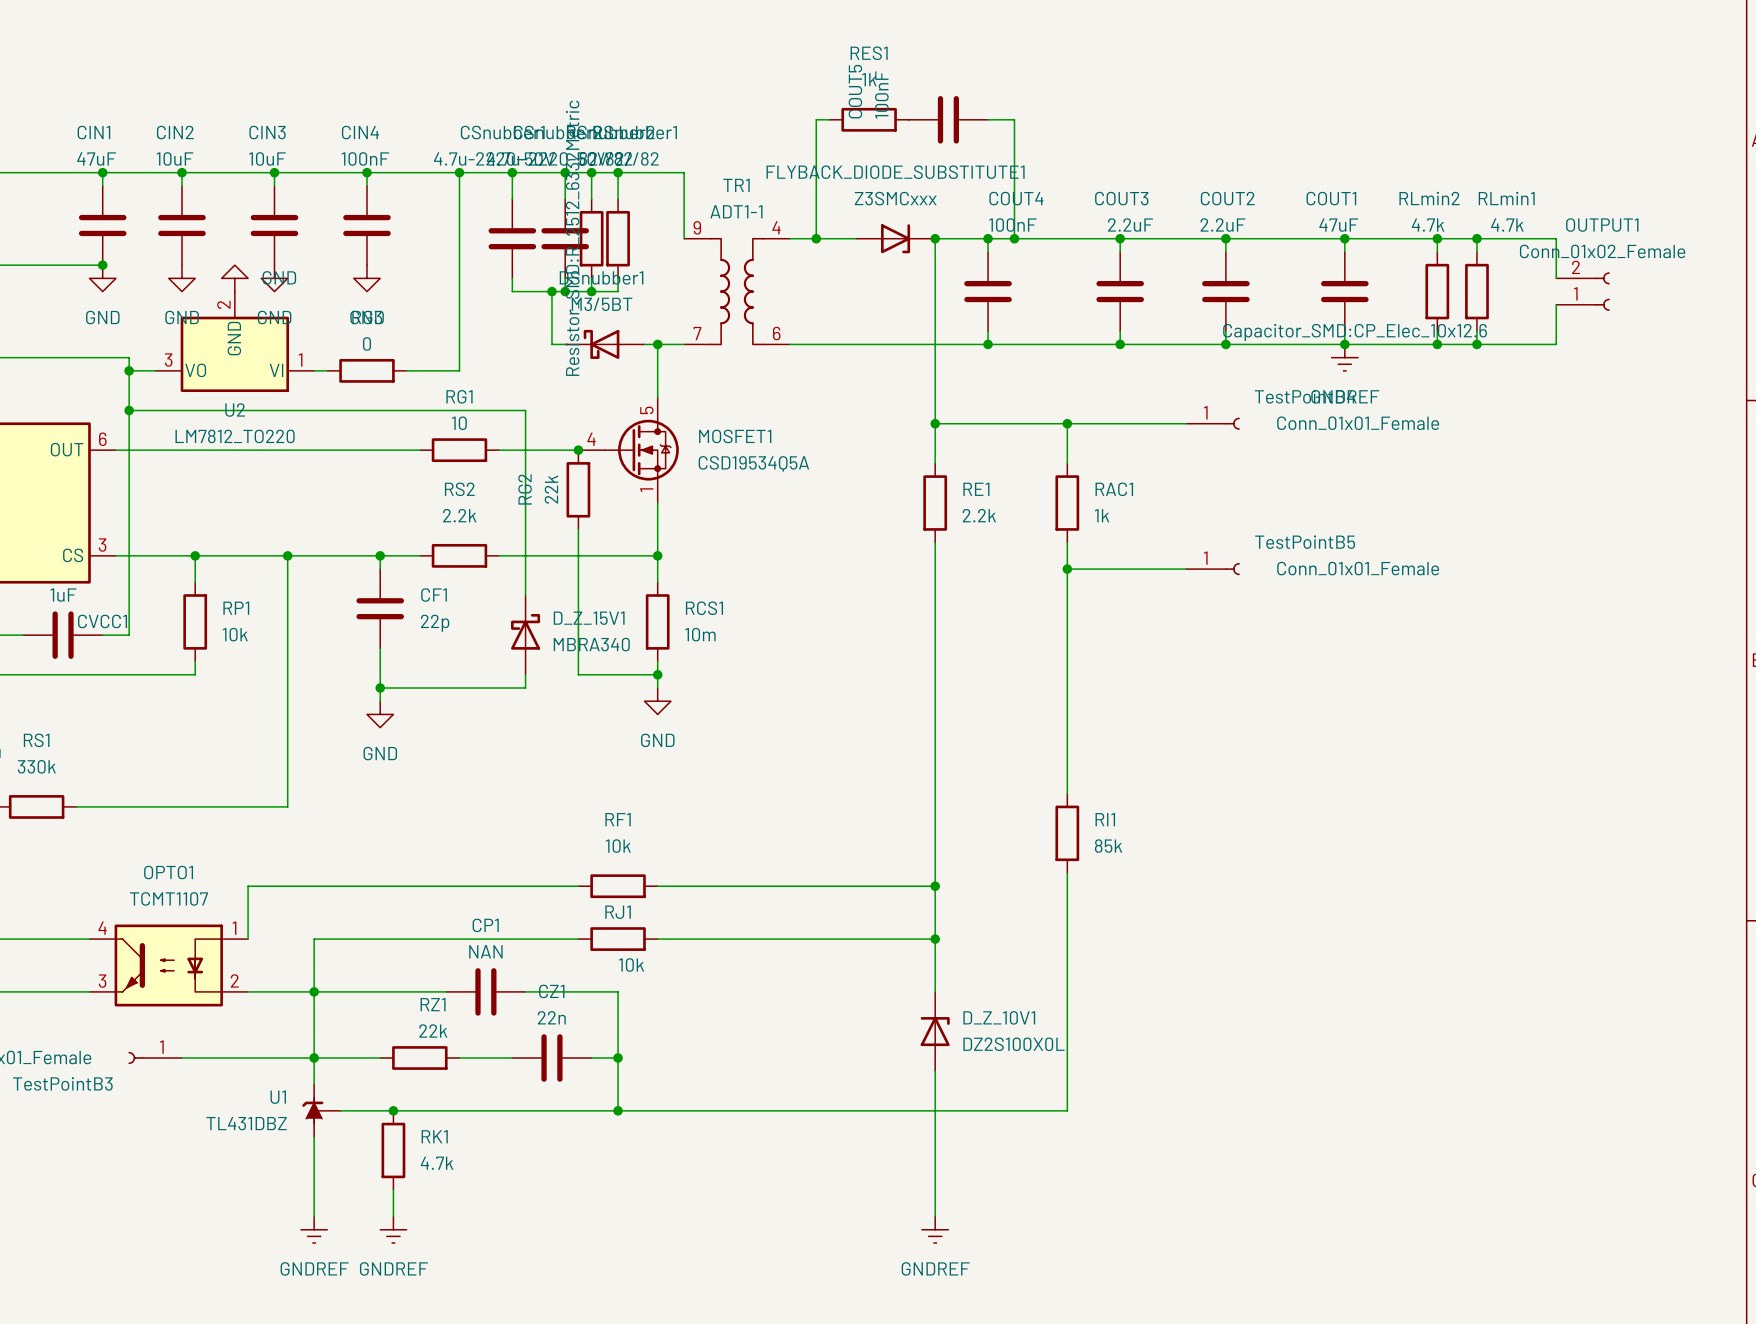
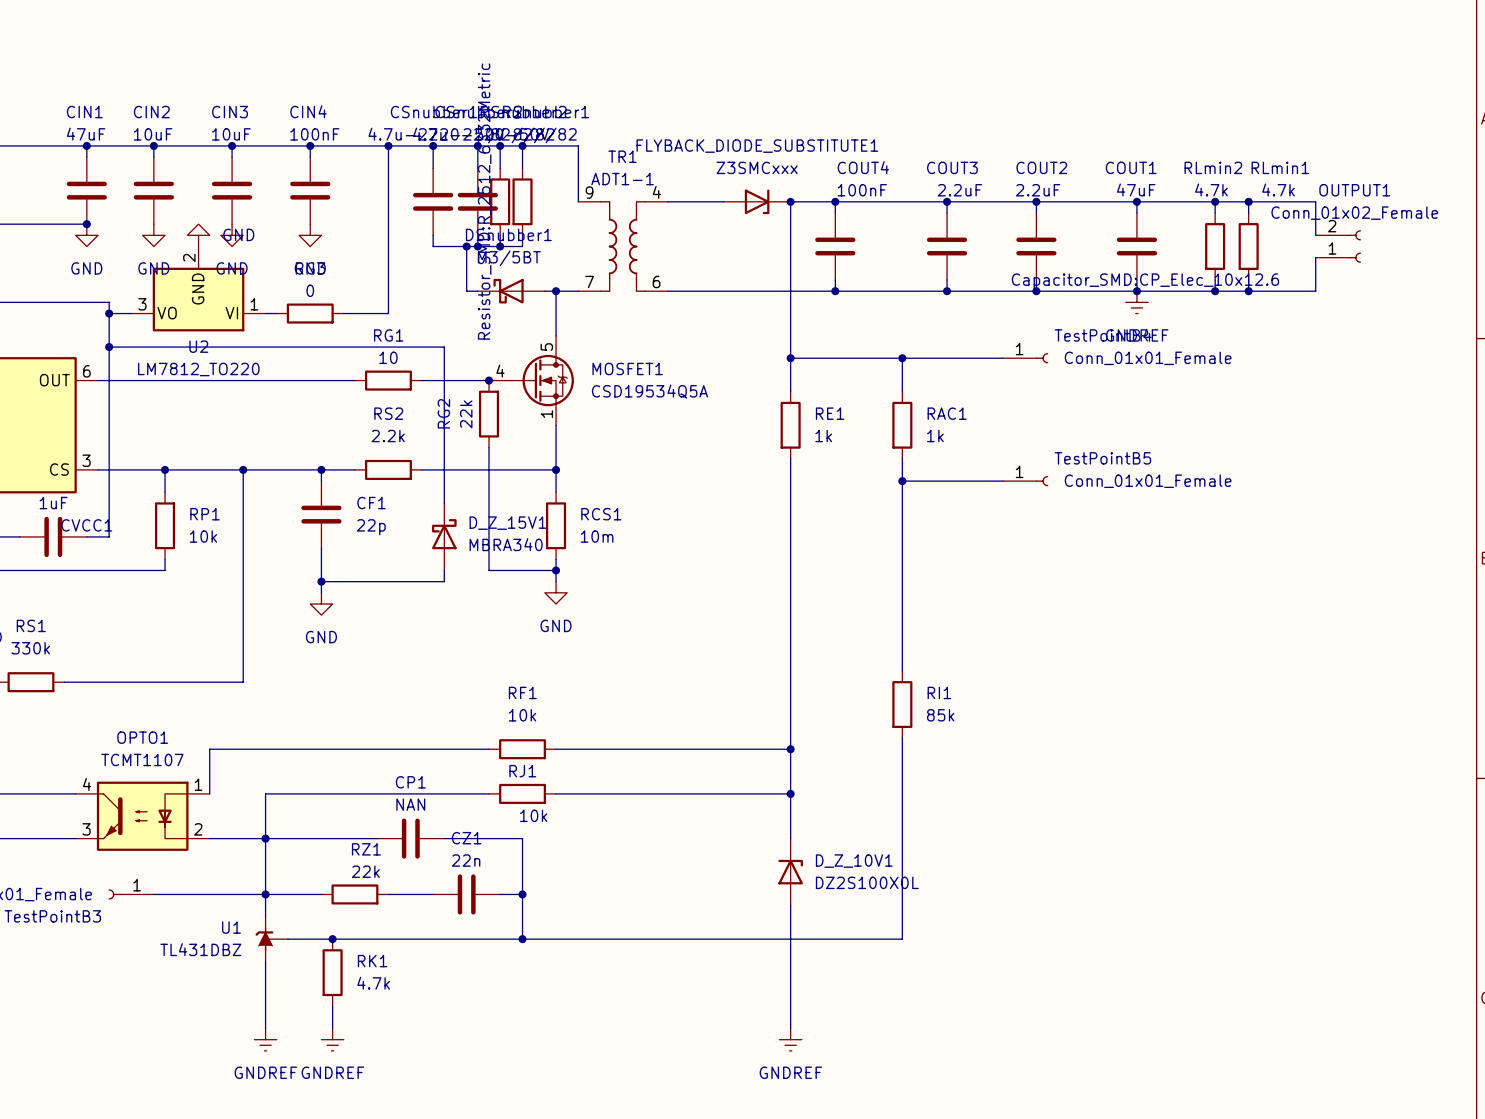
wire: (829, 119) (816, 119) (816, 238) -> none
RES1: 1k (869, 119) -> none
COUT5: 100nF (948, 119) -> none
wire: (988, 119) (1014, 119) (1014, 238) -> none
junction: (816, 238) -> none
junction: (1014, 238) -> none
RE1 value: 2.2k (979, 515) -> 1k (823, 436)

